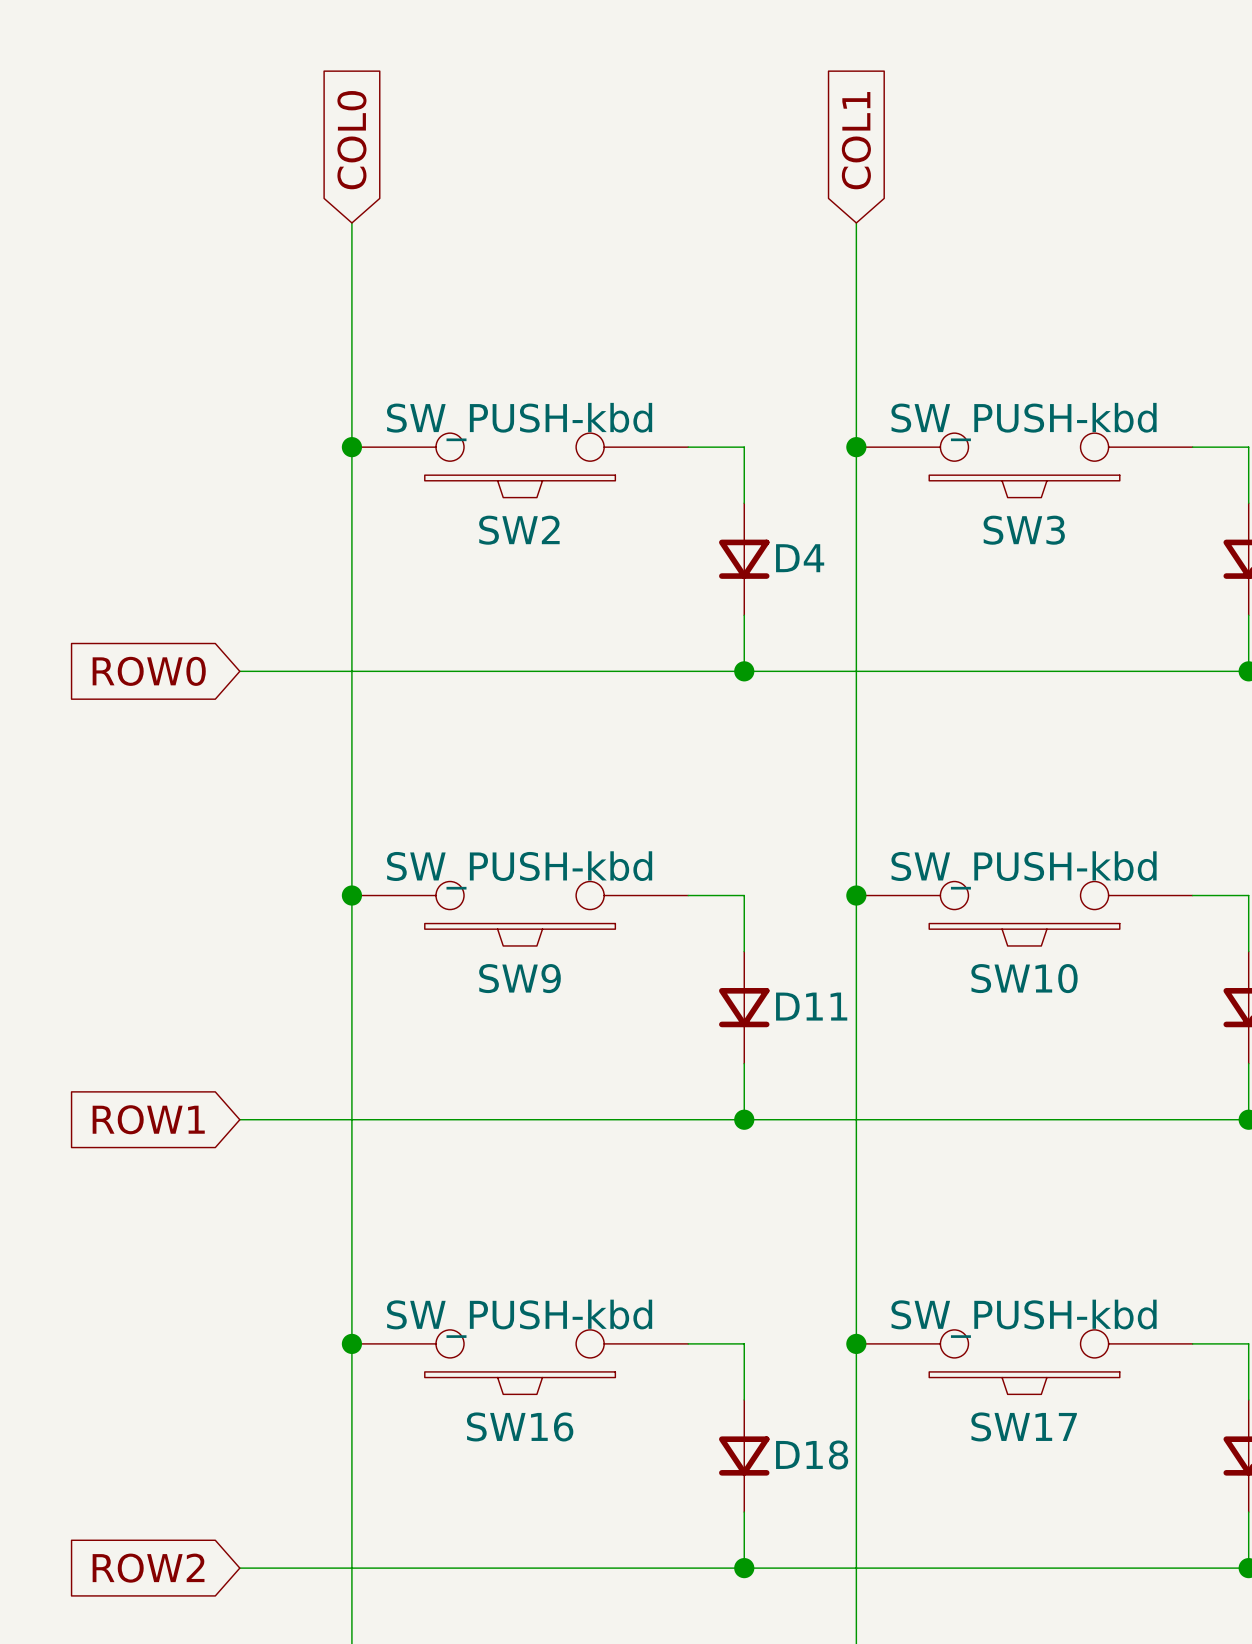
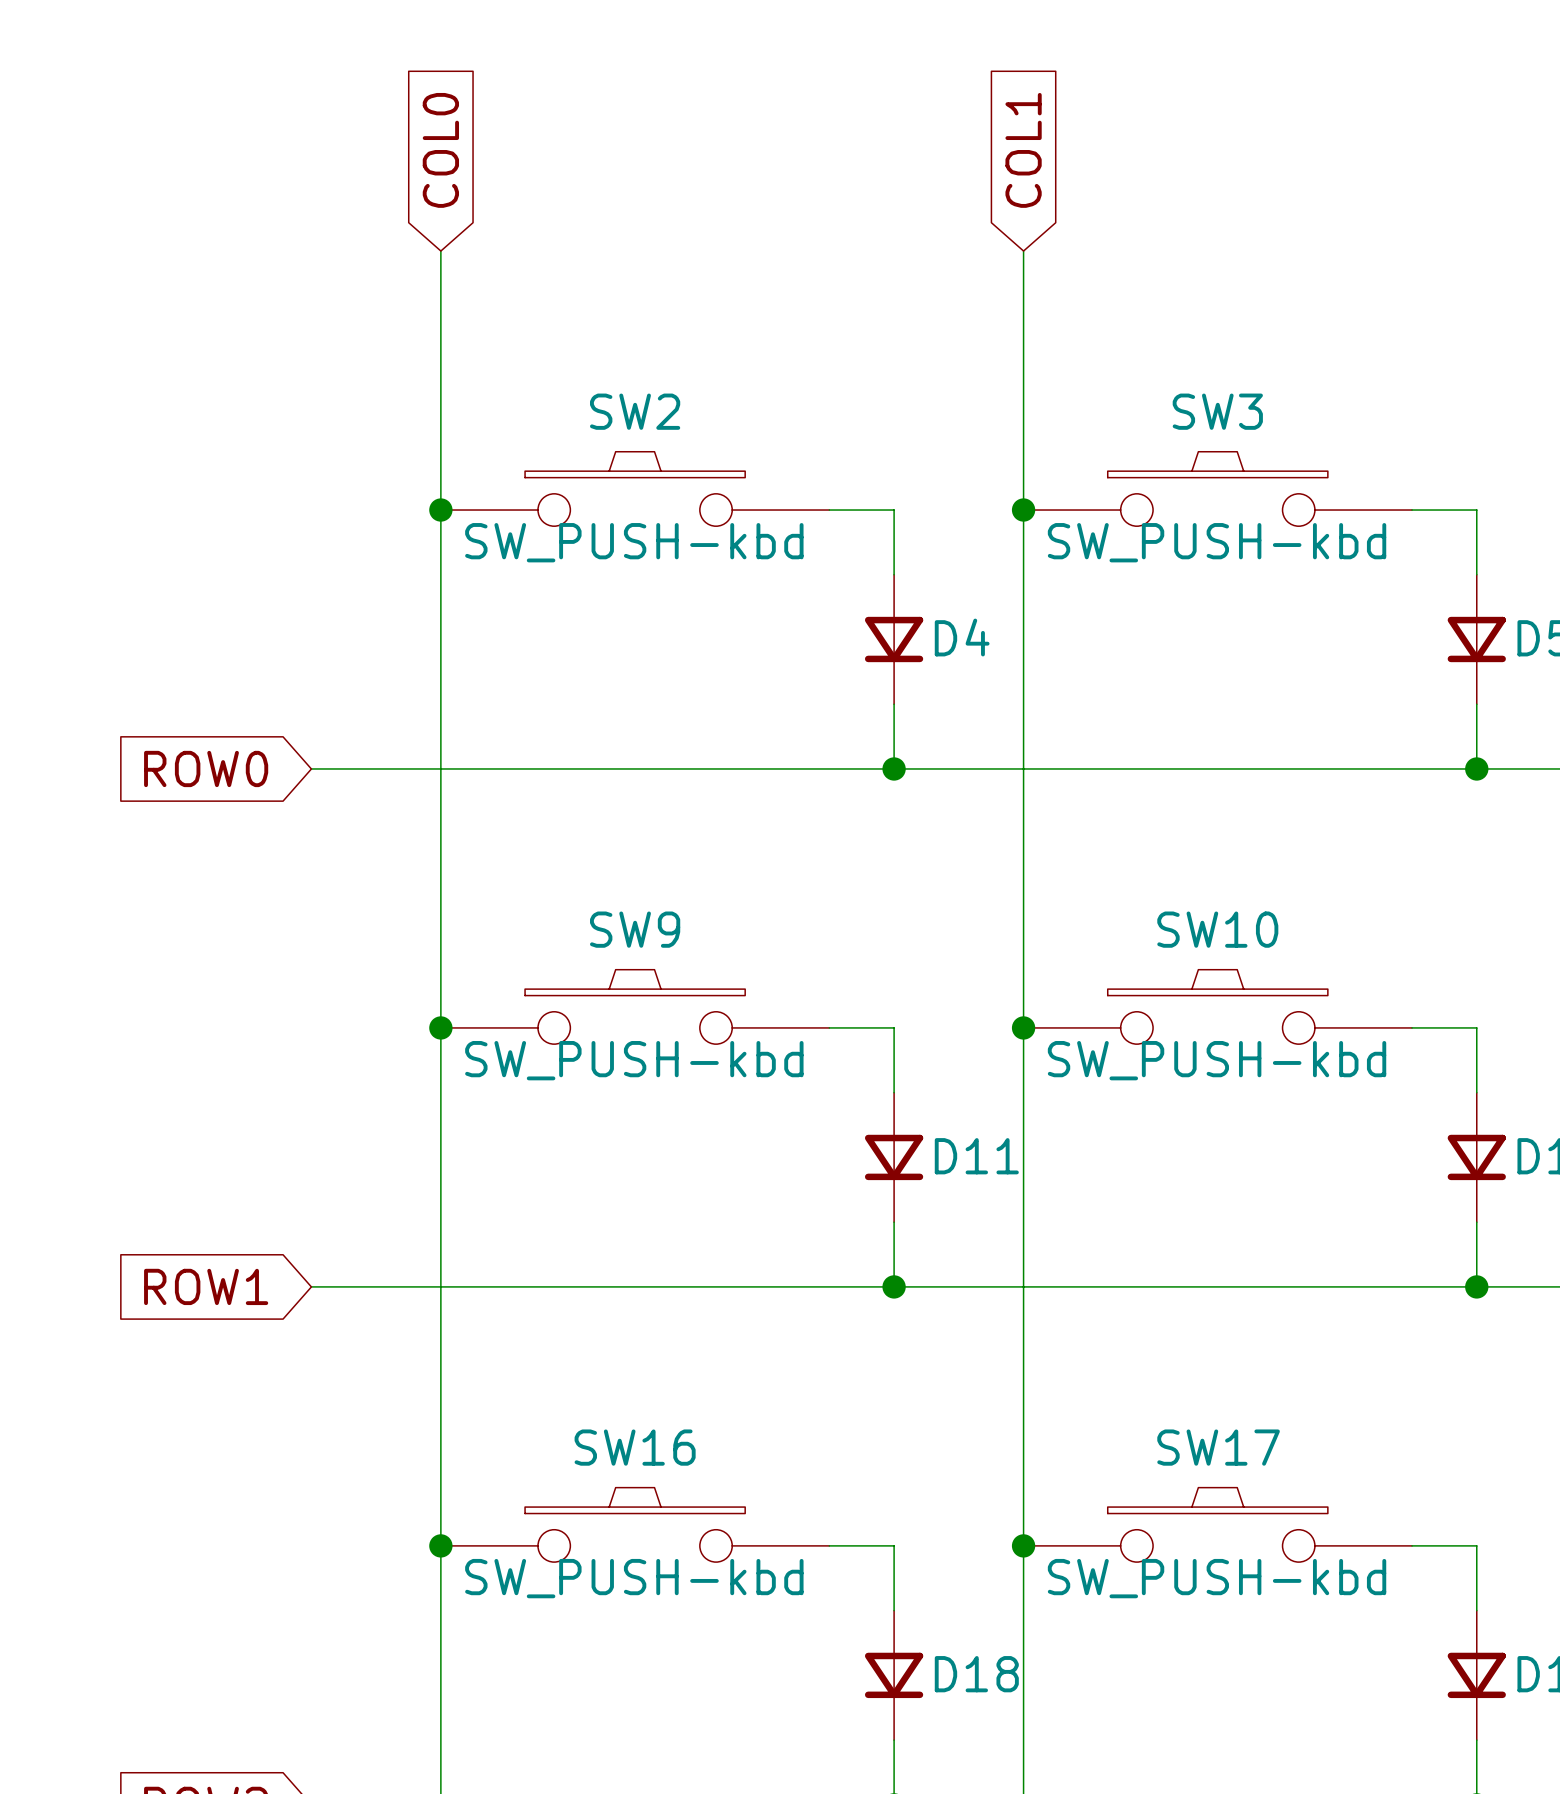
SW2 rotation: 0° (520, 486) -> 180° (635, 464)
SW3 rotation: 0° (1024, 486) -> 180° (1217, 464)
SW9 rotation: 0° (520, 934) -> 180° (635, 982)
SW10 rotation: 0° (1024, 934) -> 180° (1217, 982)
SW16 rotation: 0° (520, 1383) -> 180° (635, 1500)
SW17 rotation: 0° (1024, 1383) -> 180° (1217, 1500)

